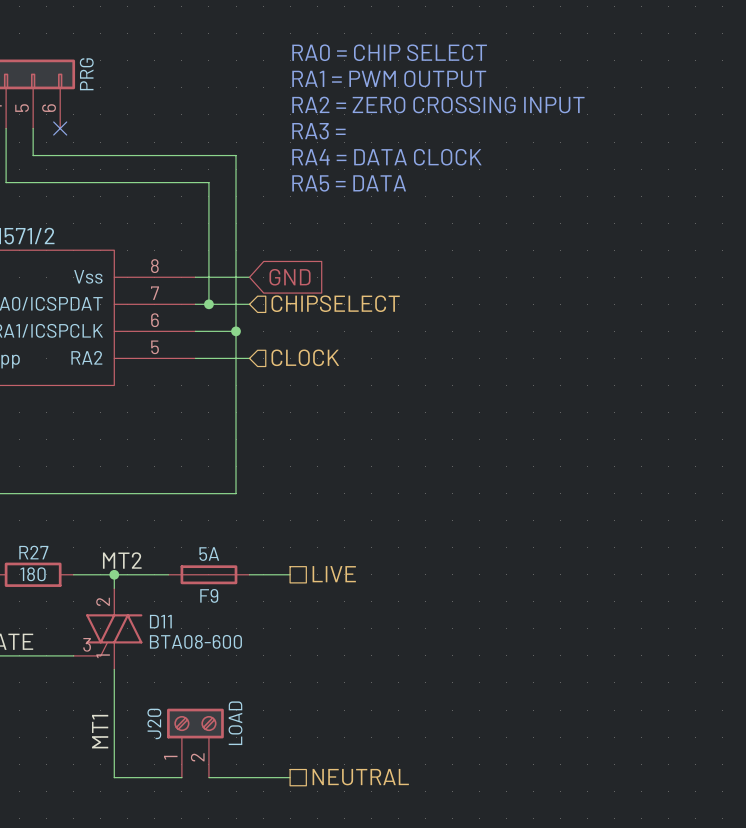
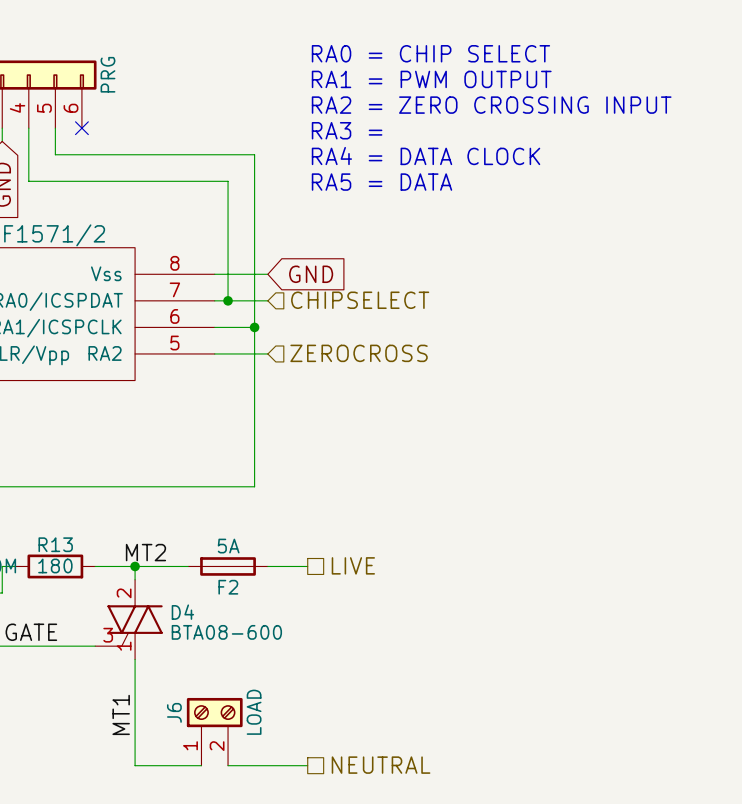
hierarchical label: CLOCK (305, 357) -> ZEROCROSS (359, 353)
R27 name: R27 (33, 552) -> R13 (55, 544)
F9 name: F9 (209, 595) -> F2 (228, 587)
D11 name: D11 (160, 621) -> D4 (182, 612)
J20 name: J20 (154, 723) -> J6 (174, 712)

